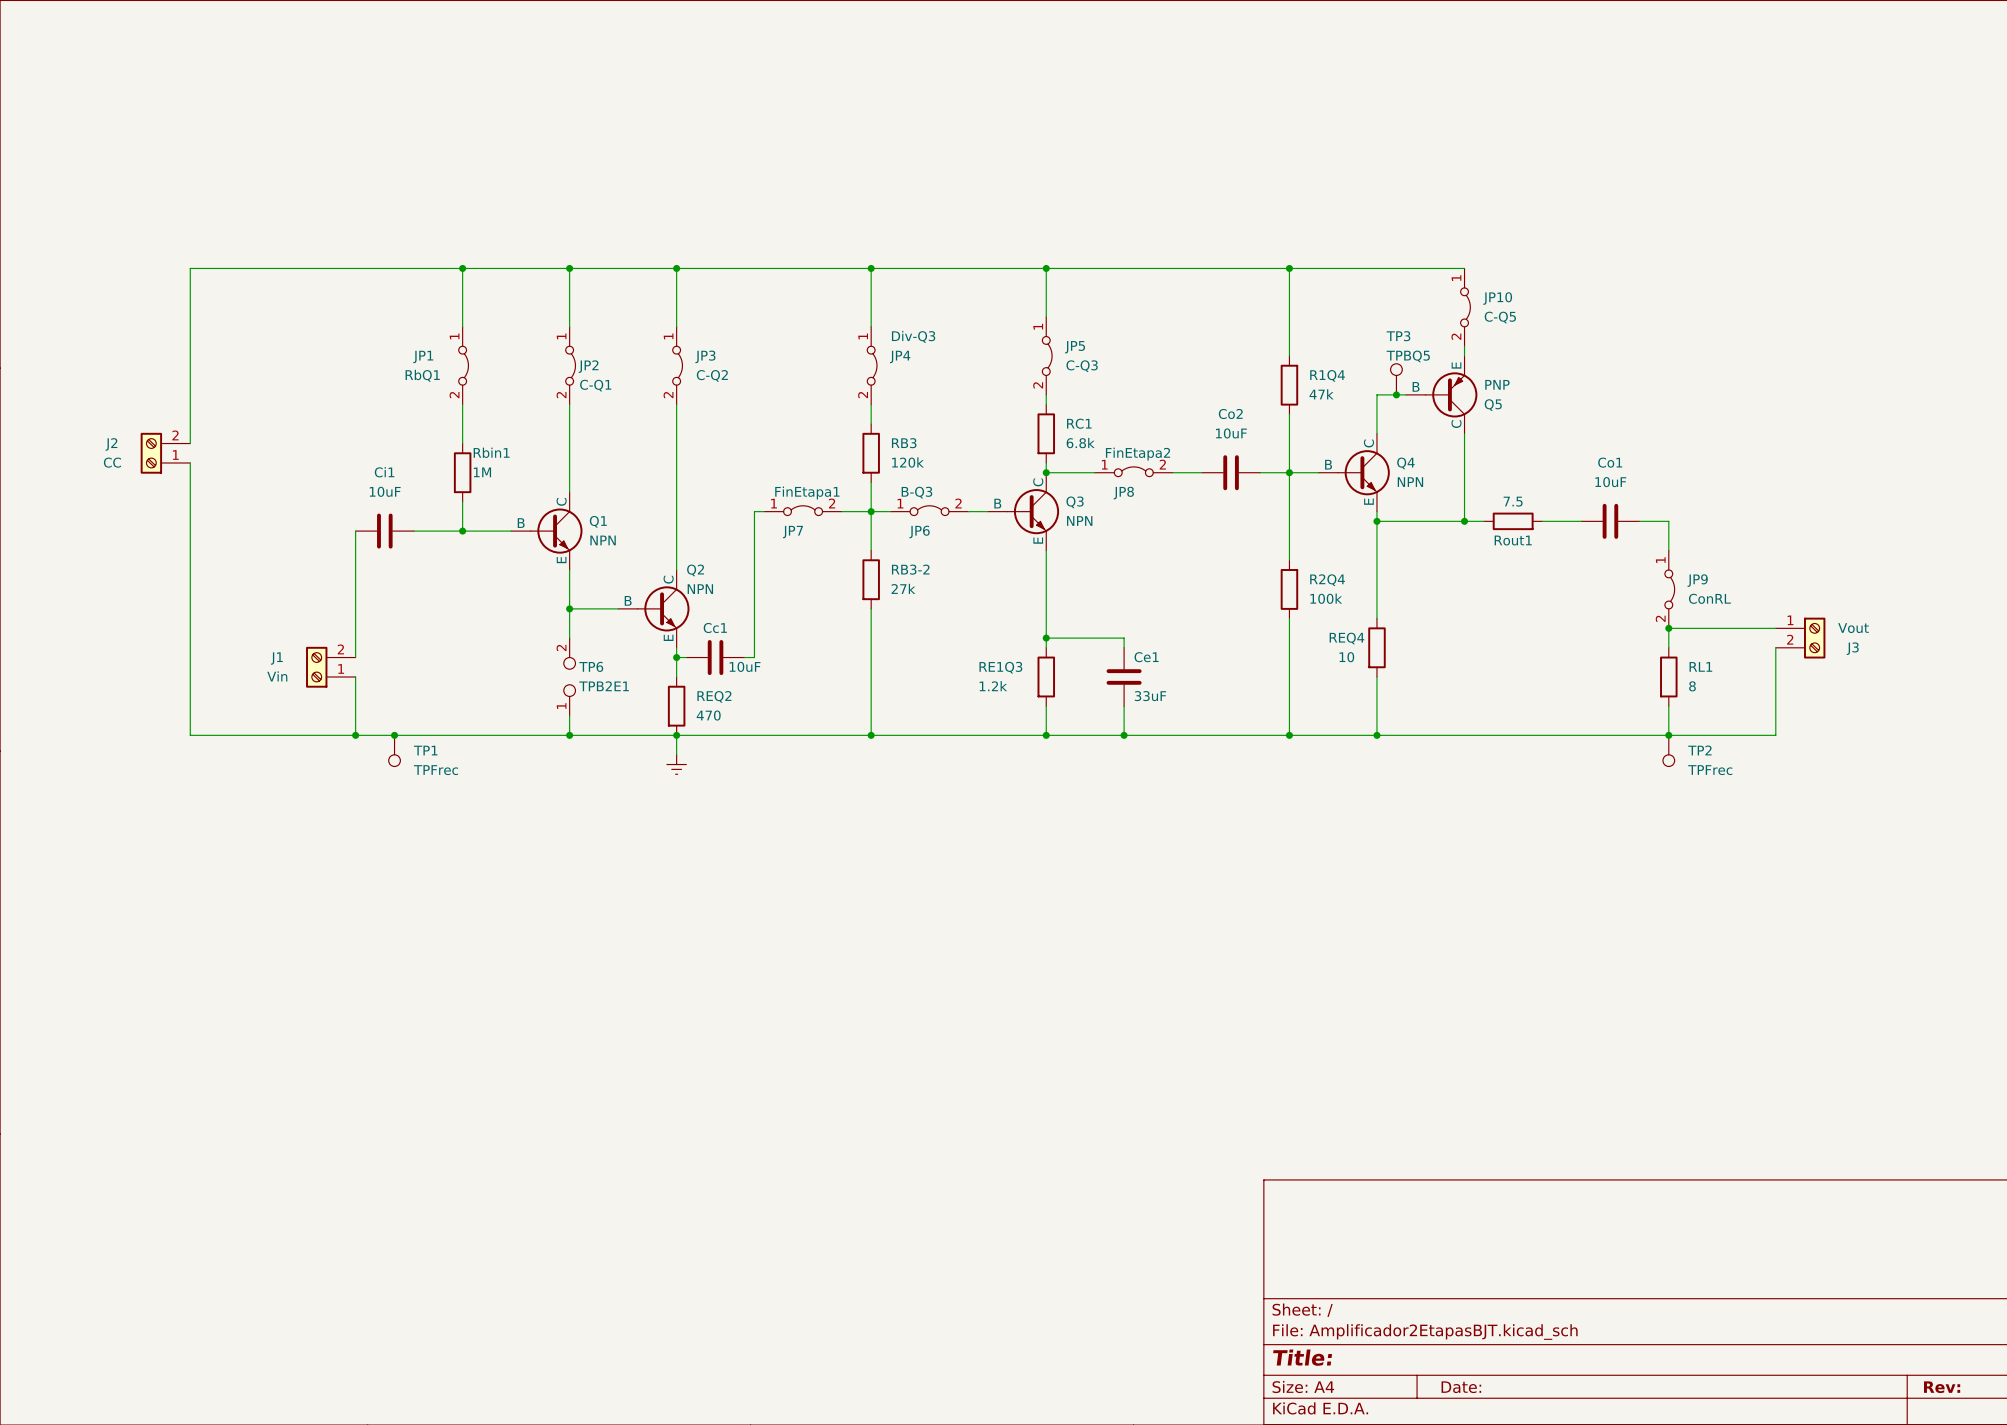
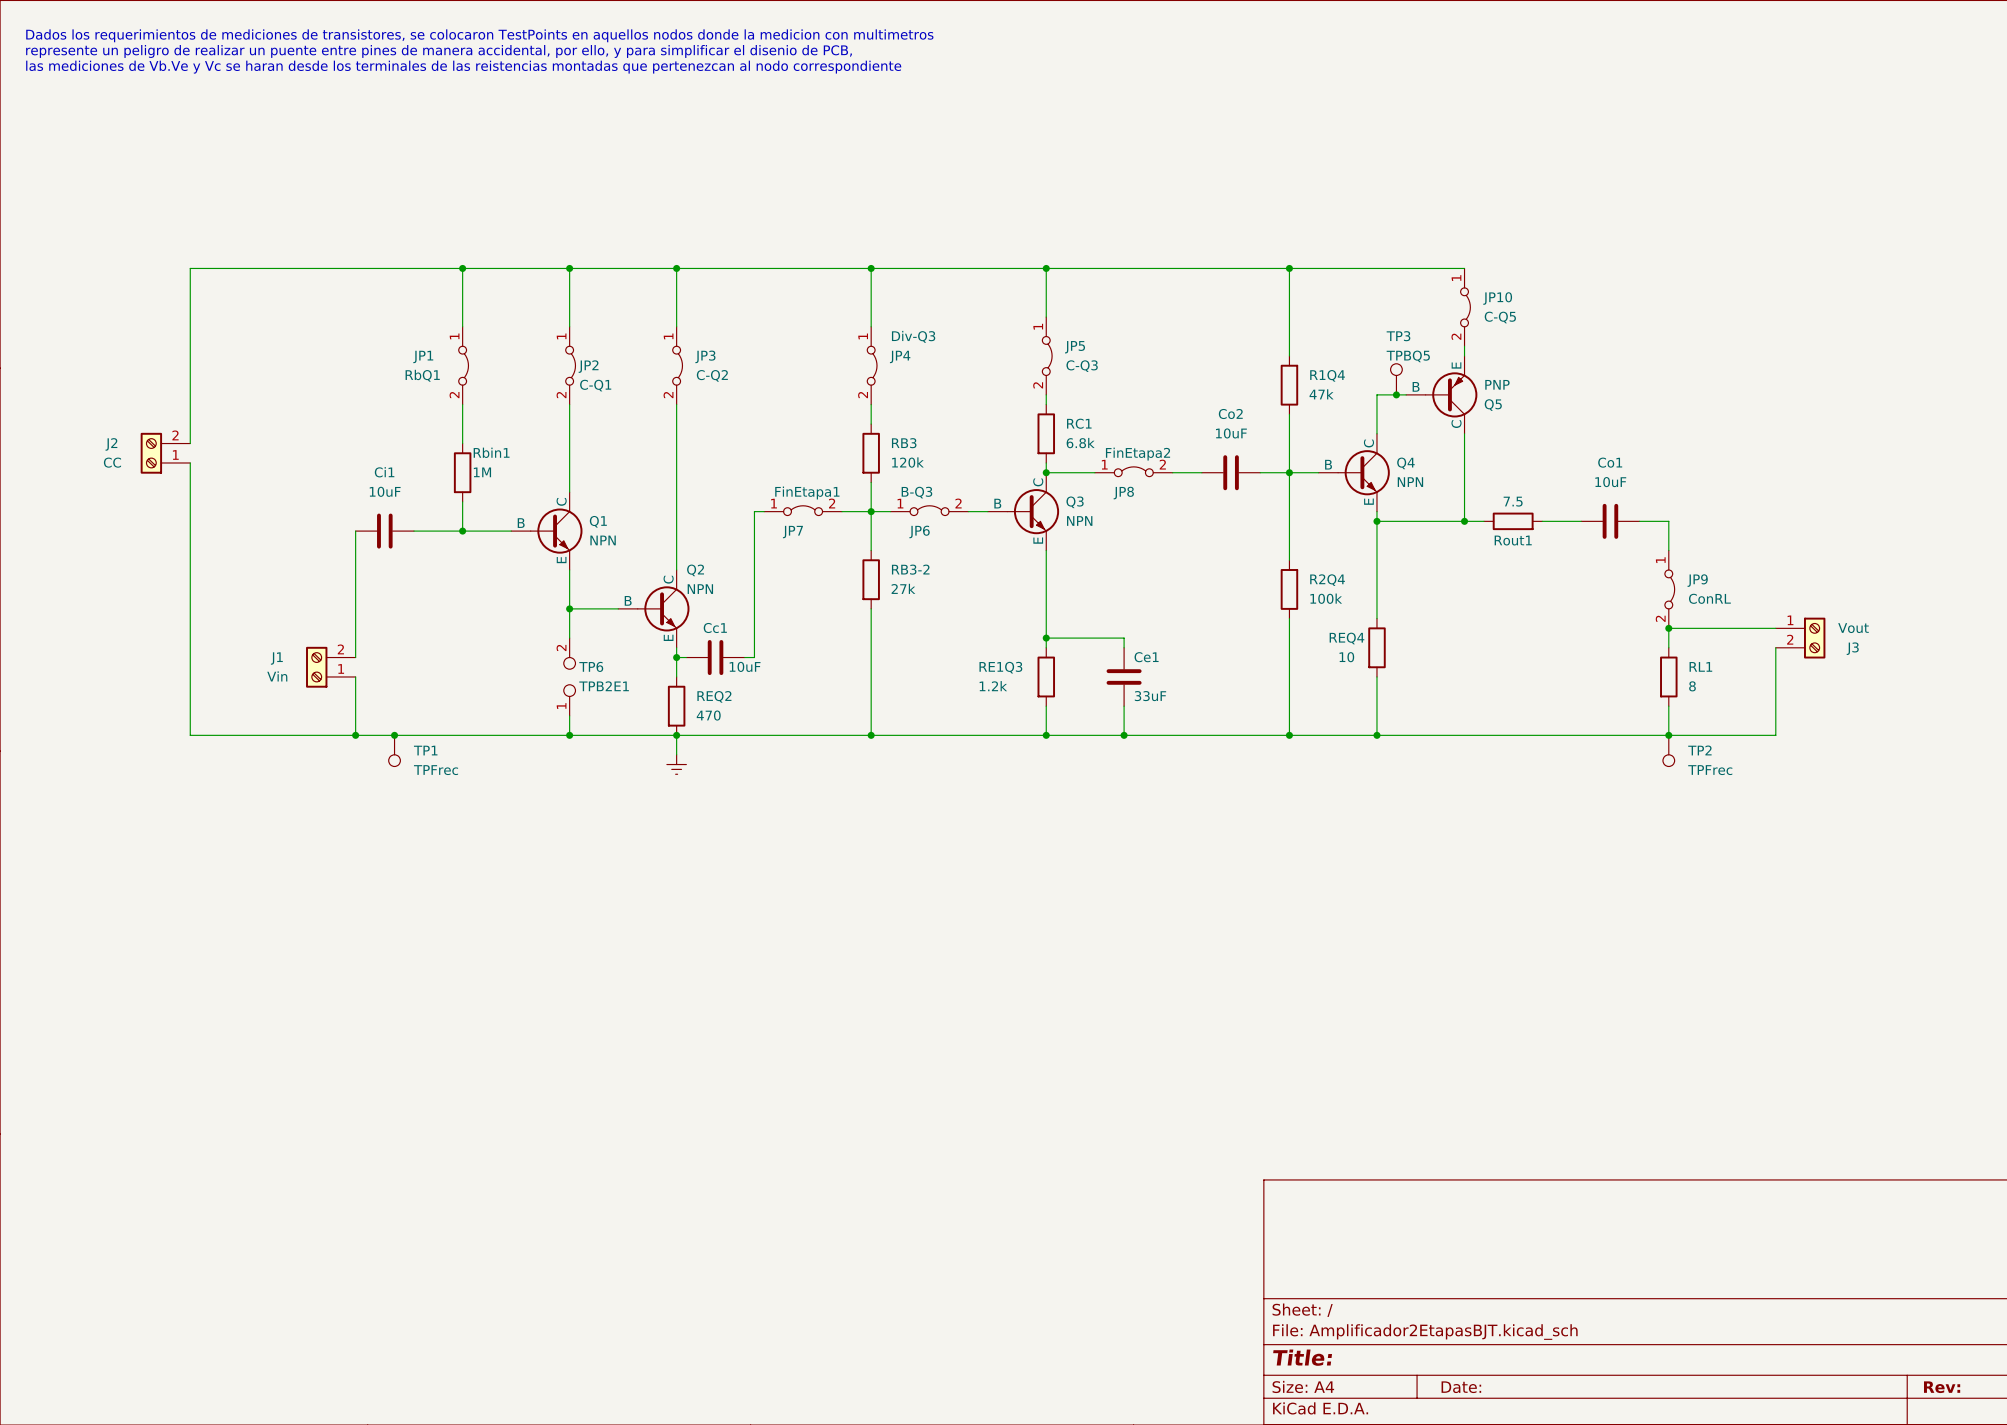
text: none -> Dados los requerimientos de mediciones de transistores, se colocaron TestPoints en aquellos nodos donde la medicion con multimetros (479, 35)
text: none -> represente un peligro de realizar un puente entre pines de manera accidental, por ello, y para simplificar el disenio de PCB, (439, 51)
text: none -> las mediciones de Vb.Ve y Vc se haran desde los terminales de las reistencias montadas que pertenezcan al nodo correspondiente (463, 67)

